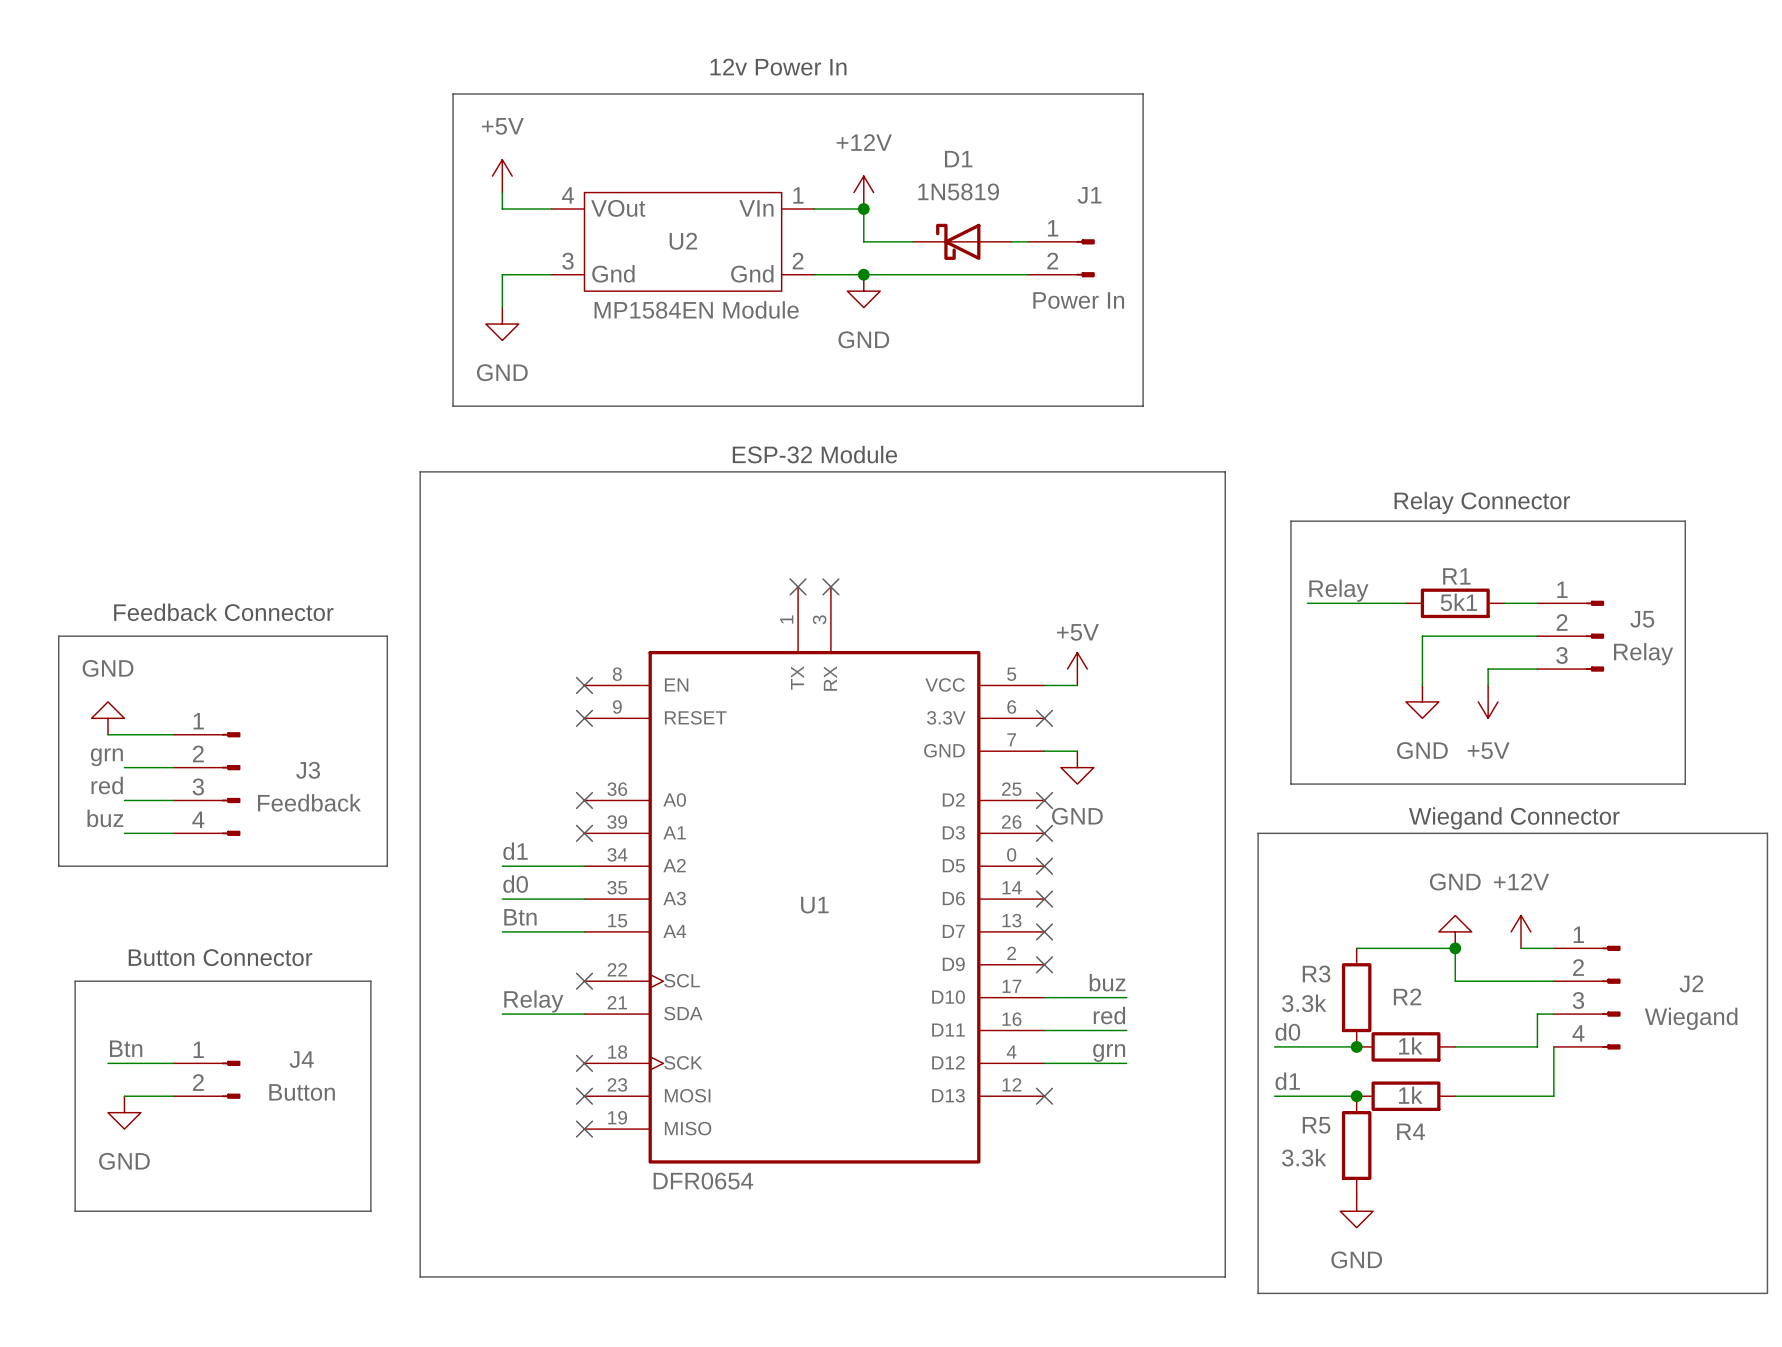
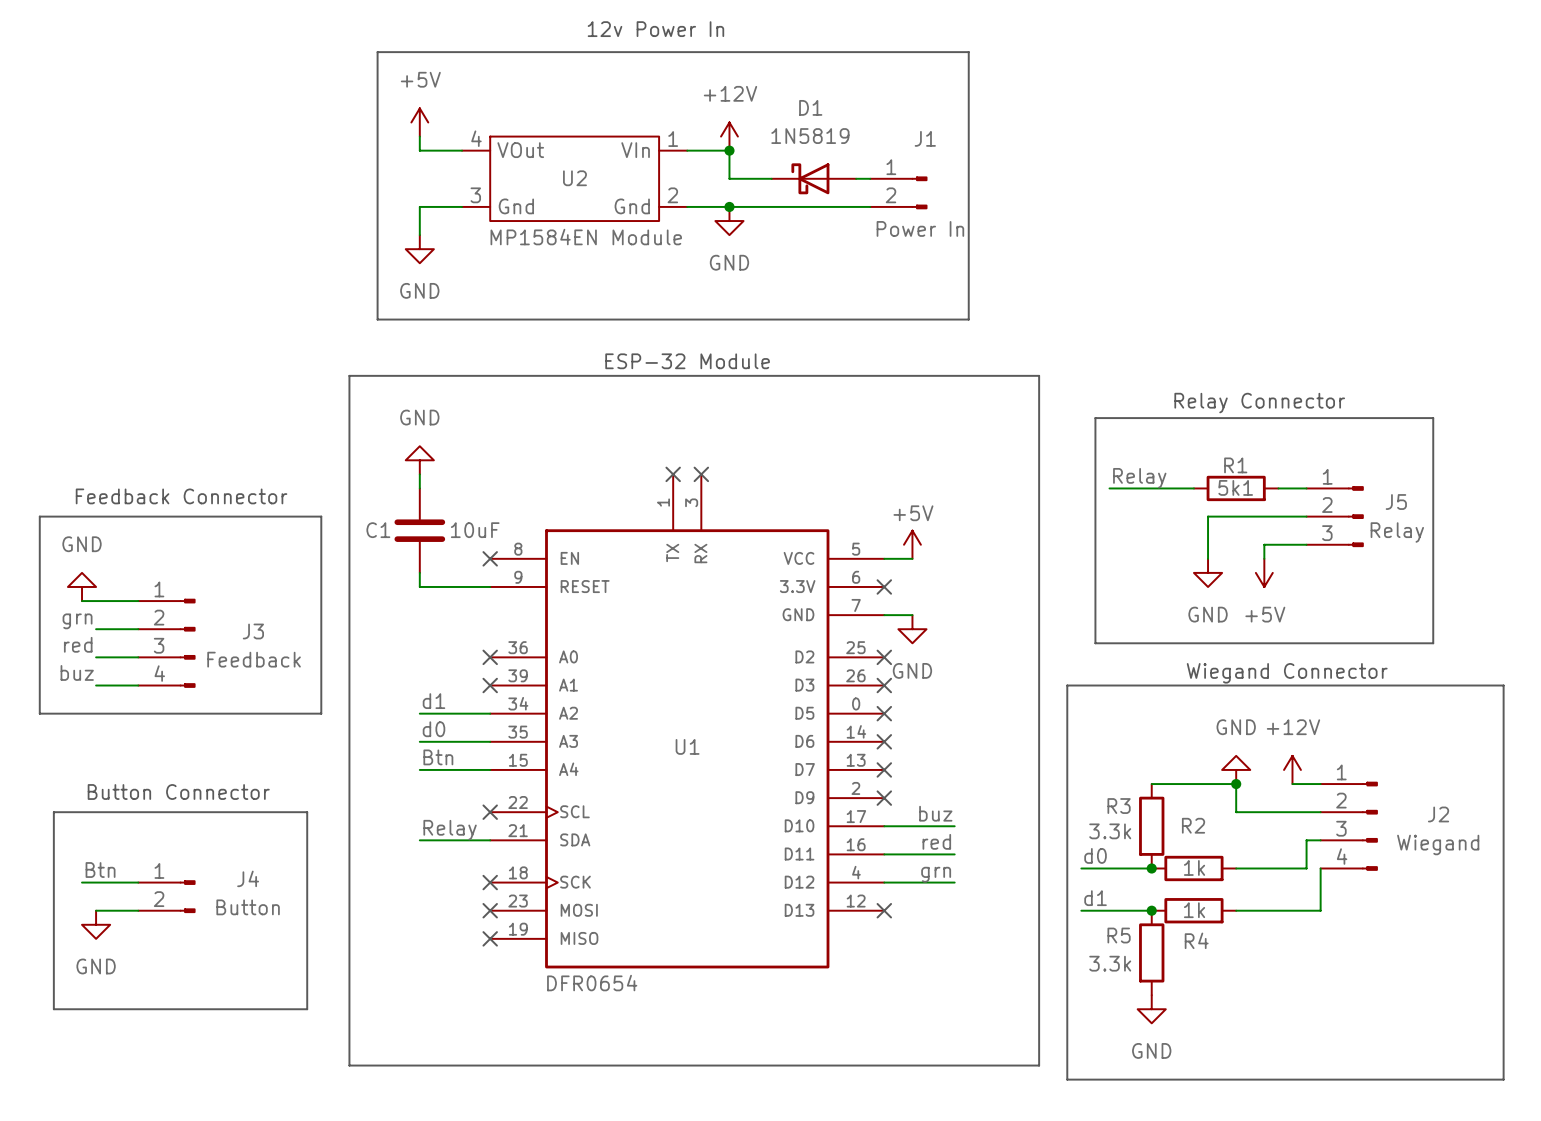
power symbol: none -> GND (419, 460)
wire: none -> (419, 474) (419, 488)
C1: none -> 10uF (419, 530)
wire: none -> (419, 572) (419, 586) (490, 586)
no-connect mark: (584, 718) -> none

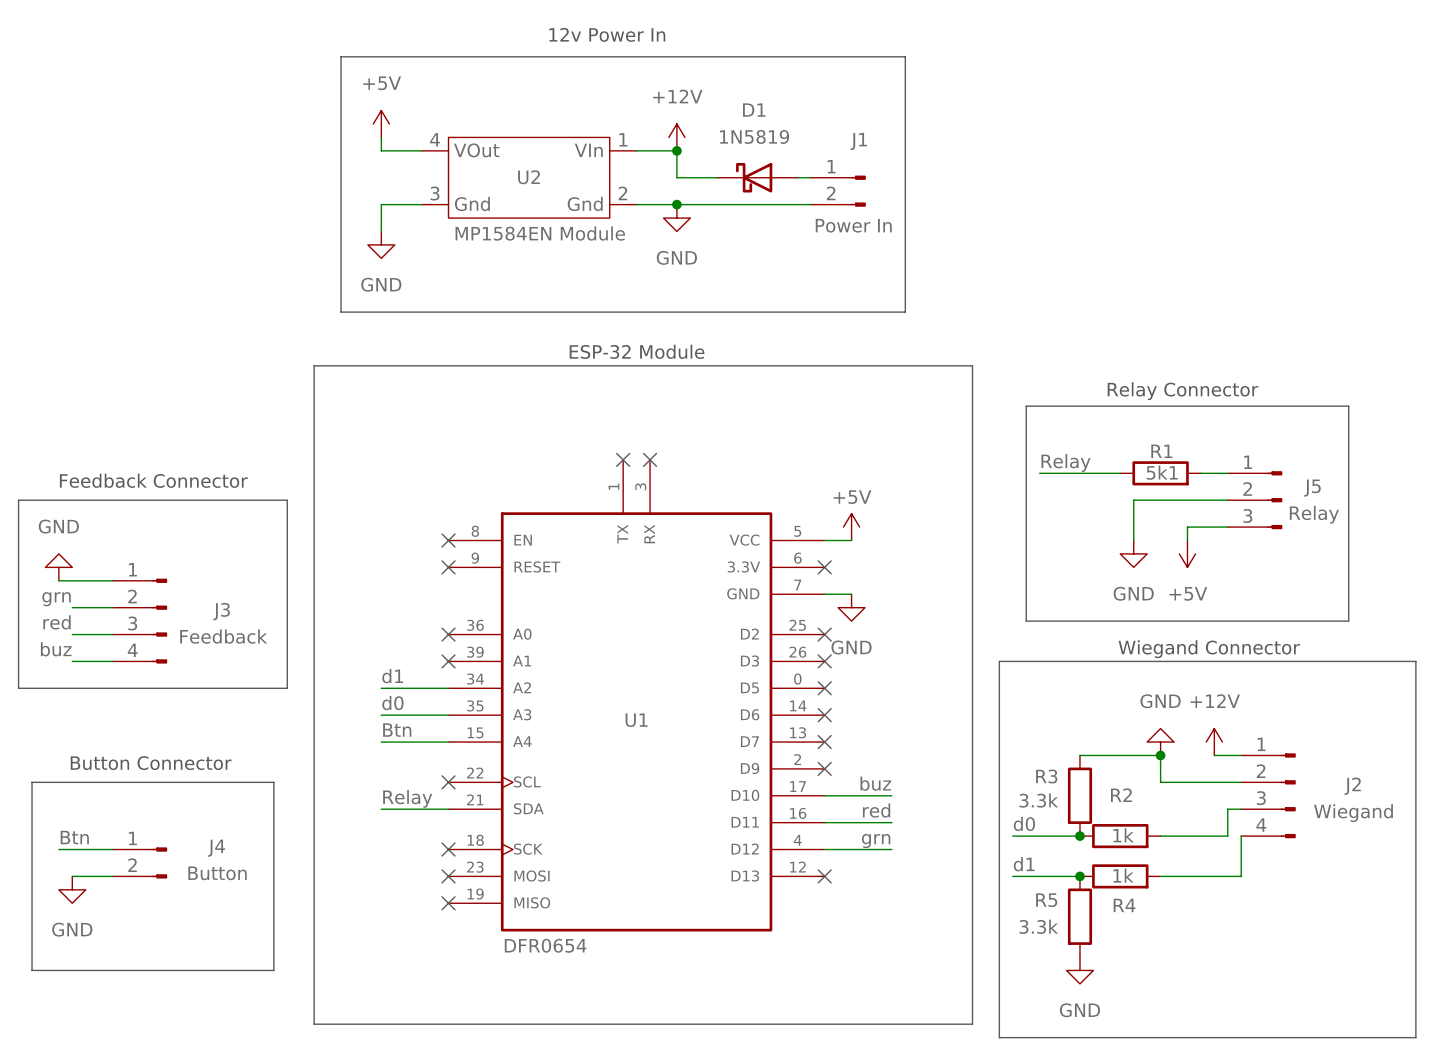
power symbol: GND (419, 460) -> none
wire: (419, 474) (419, 488) -> none
C1: 10uF (419, 530) -> none
wire: (419, 572) (419, 586) (490, 586) -> none
no-connect mark: none -> (448, 567)

